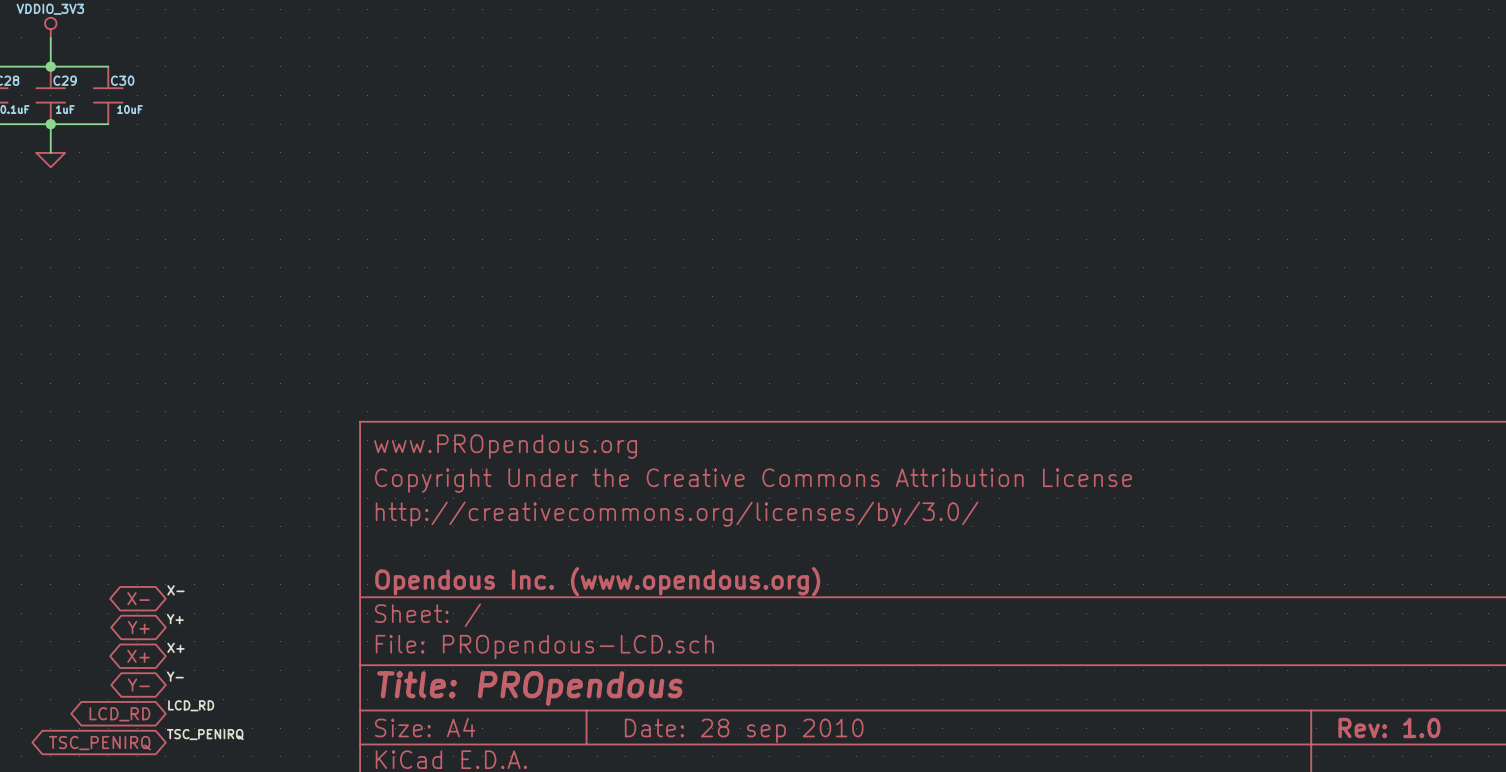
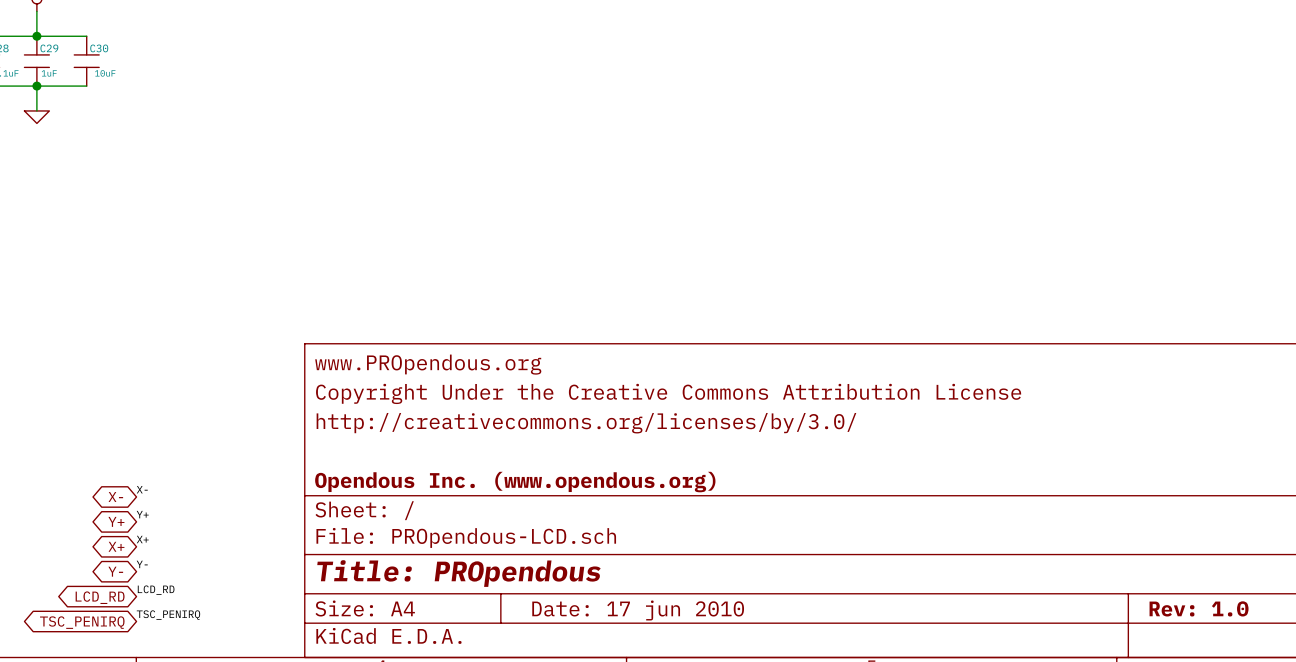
title block: Date: 28 sep 2010 (744, 730) -> Date: 17 jun 2010 (638, 610)

